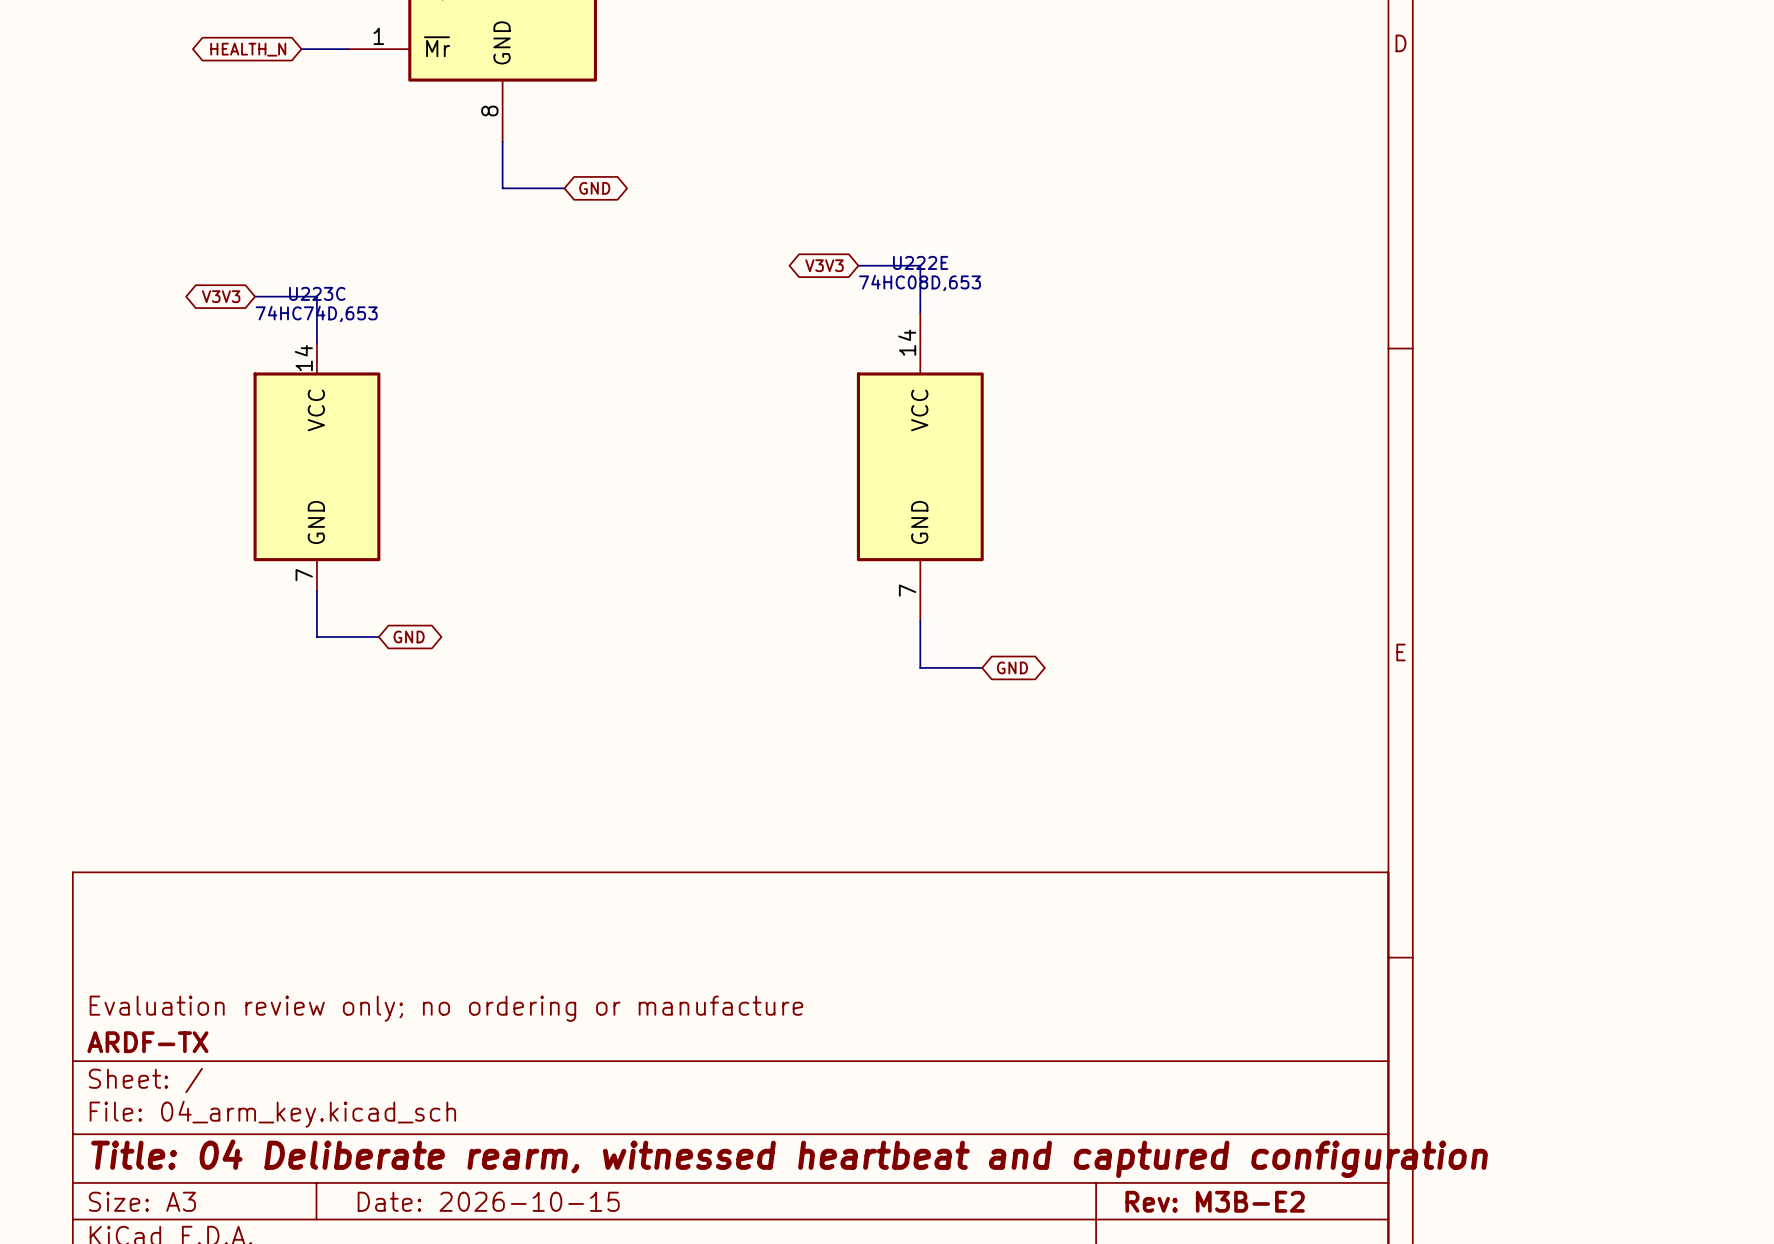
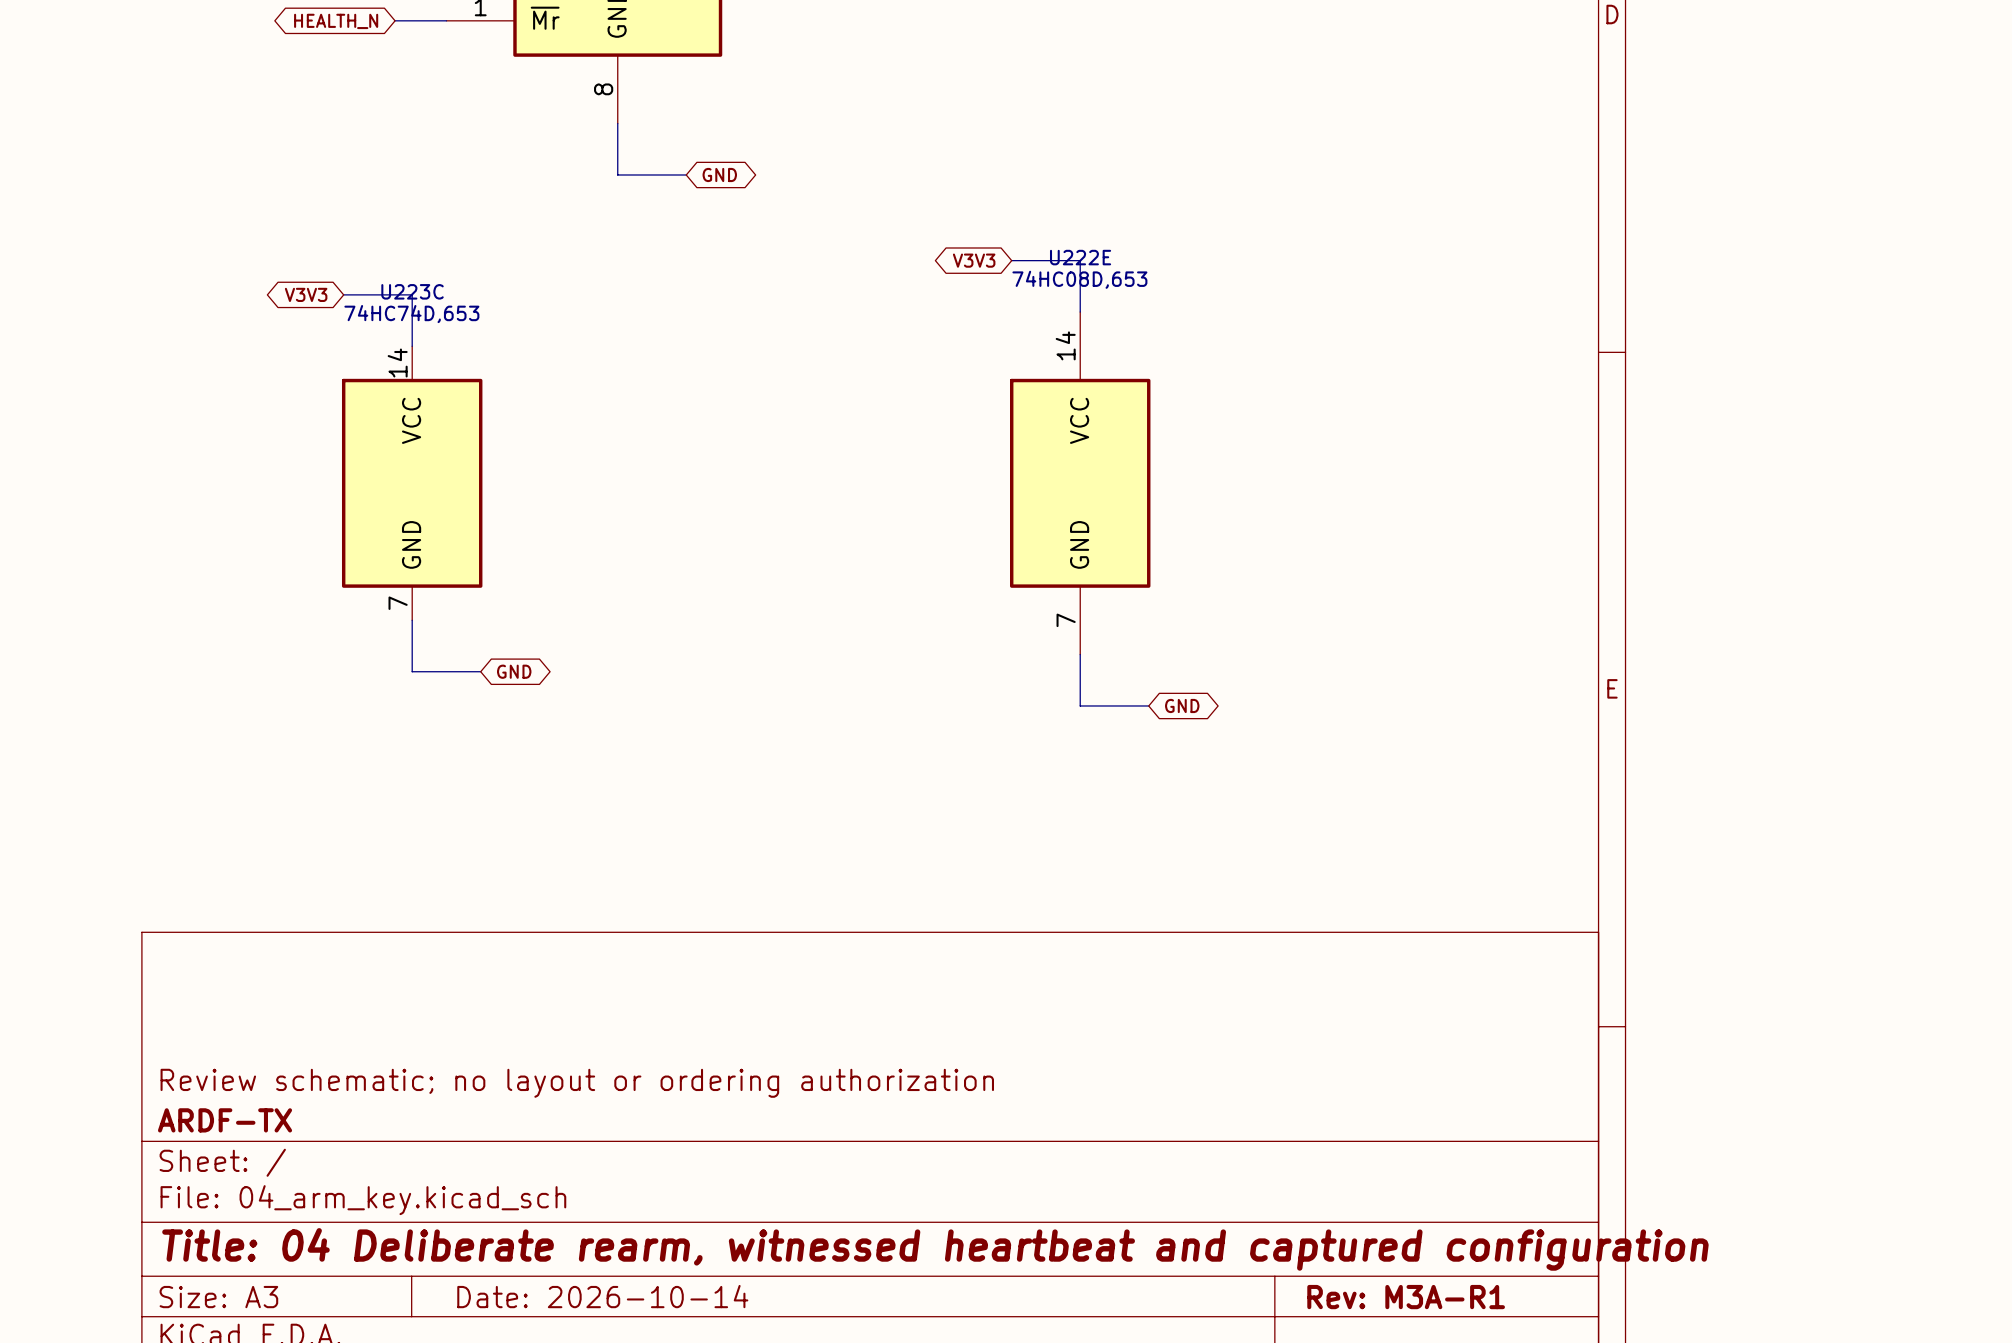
title block: Evaluation review only; no ordering or manufacture (446, 1008) -> Review schematic; no layout or ordering authorization (577, 1083)
title block: Date: 2026-10-15 (488, 1201) -> Date: 2026-10-14 (602, 1296)
title block: Rev: M3B-E2 (1215, 1201) -> Rev: M3A-R1 (1406, 1297)

